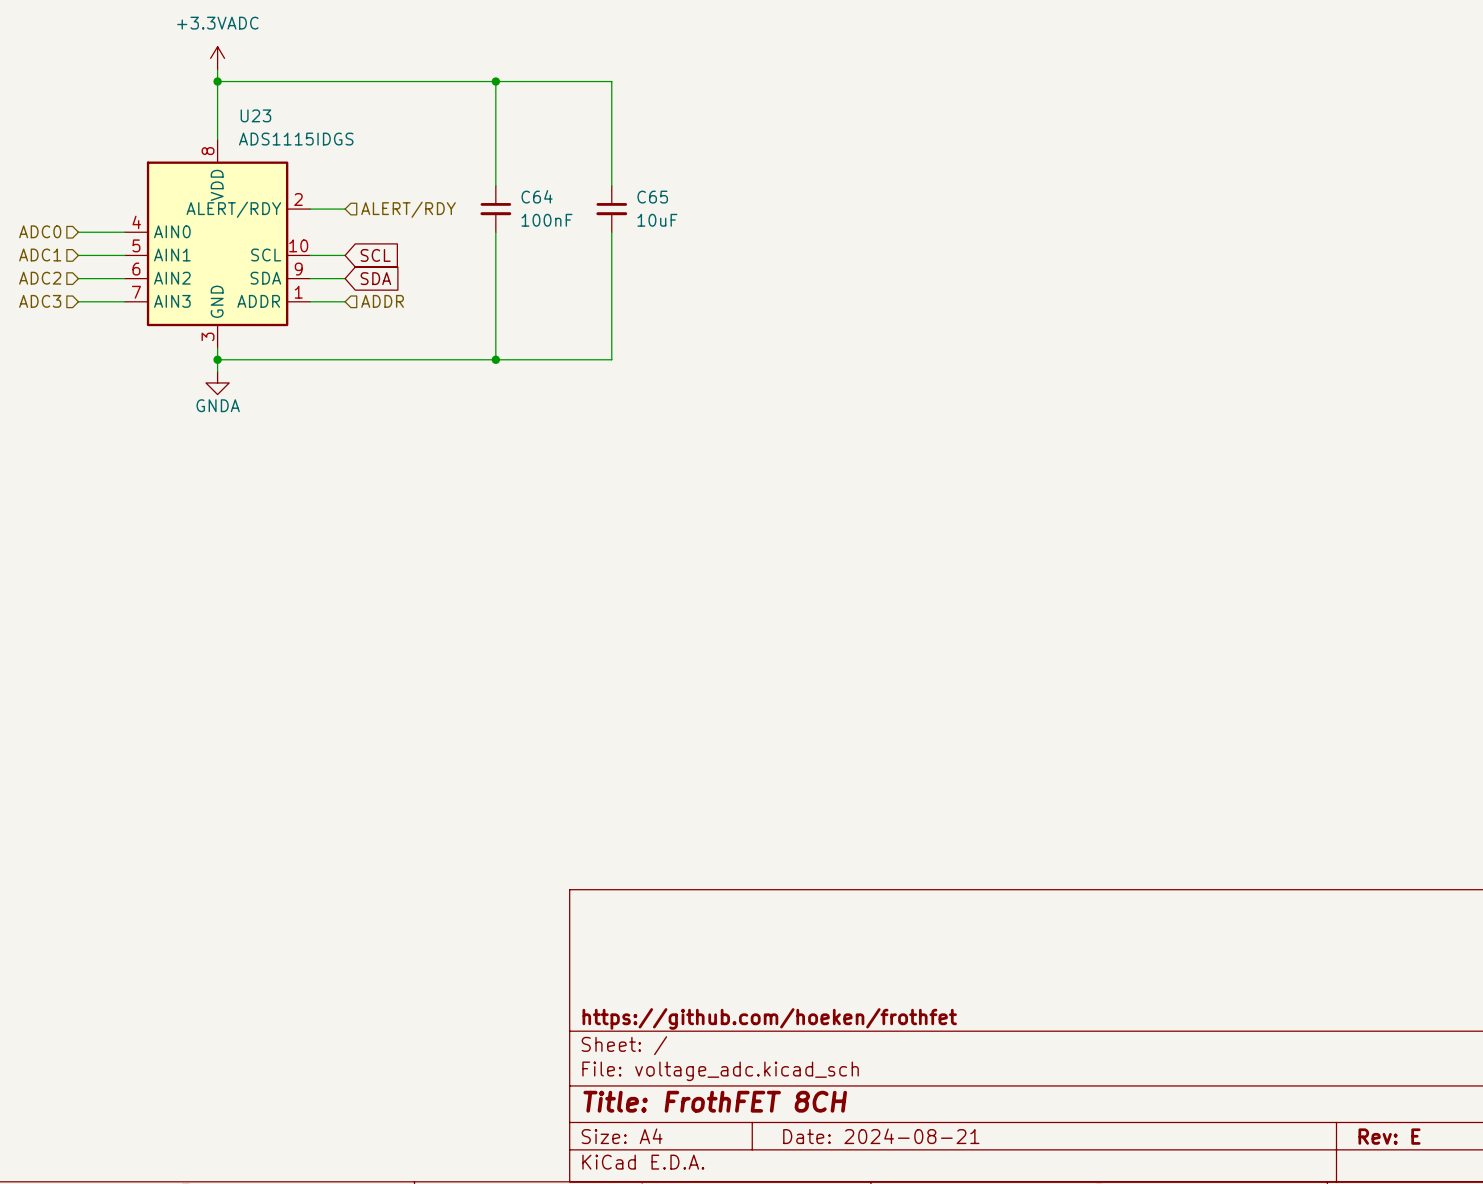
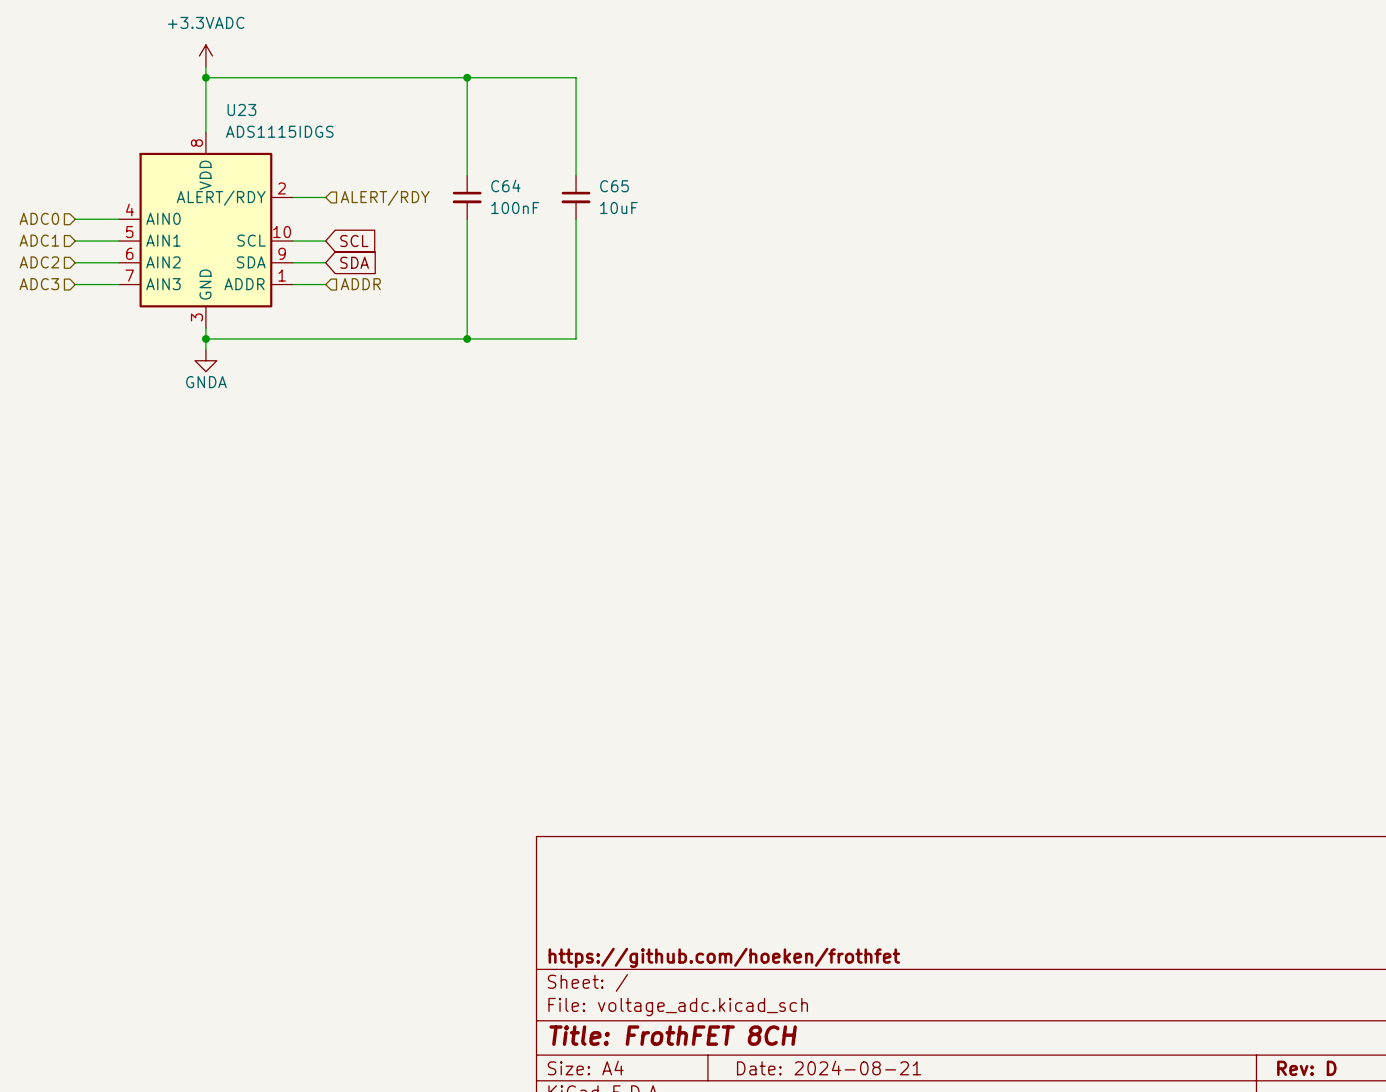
title block: Rev: E (1389, 1136) -> Rev: D (1306, 1068)

